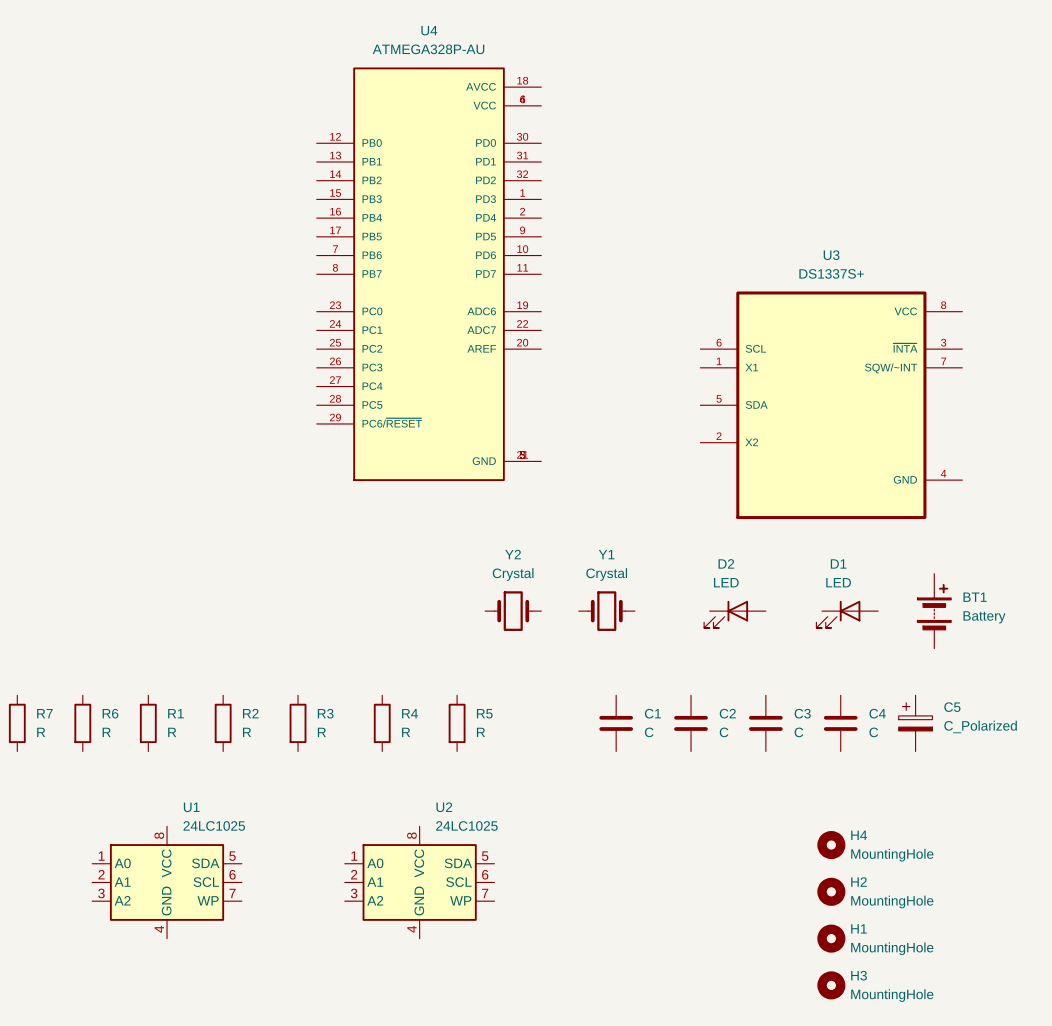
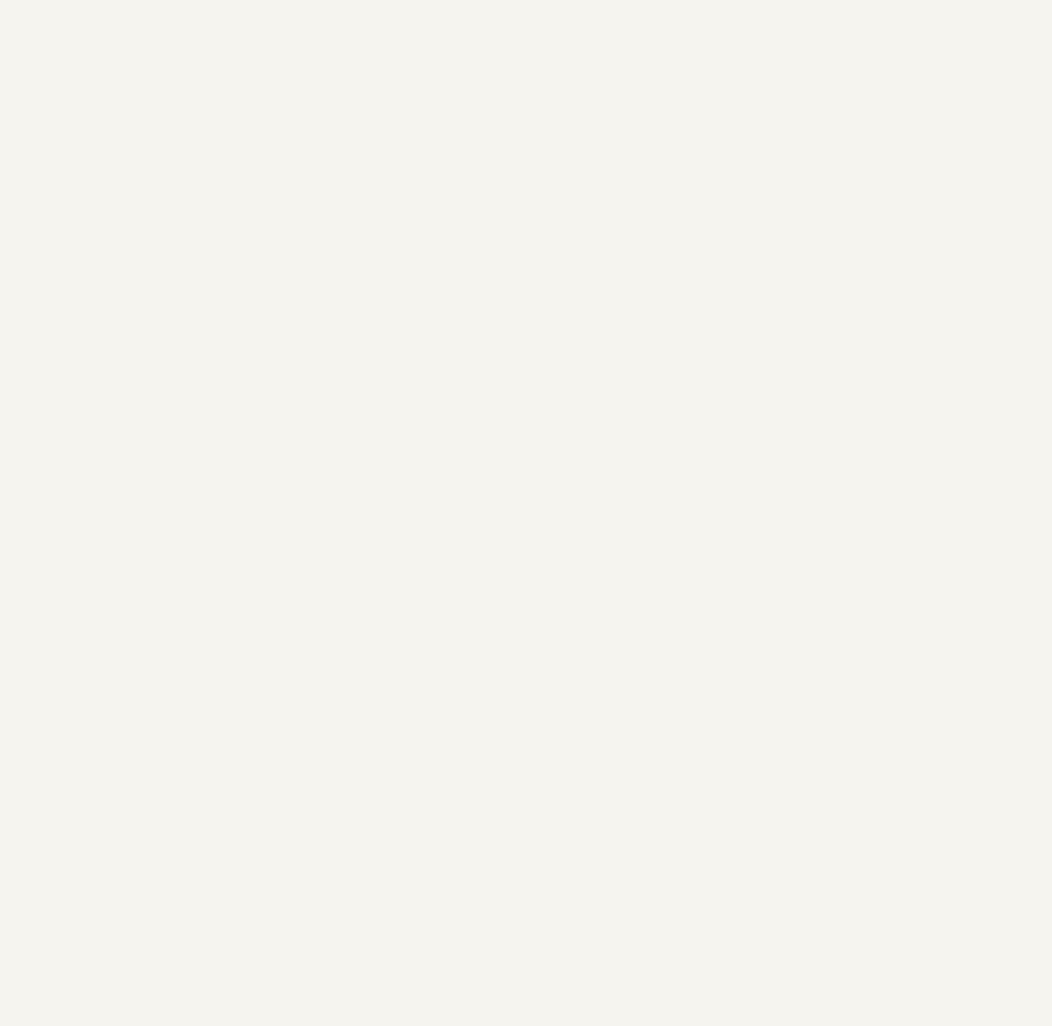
U4: ATMEGA328P-AU (429, 274) -> none
U3: DS1337S+ (831, 405) -> none
Y2: Crystal (513, 611) -> none
Y1: Crystal (606, 611) -> none
BT1: Battery (934, 611) -> none
D2: LED (734, 614) -> none
D1: LED (847, 614) -> none
R7: R (17, 723) -> none
R6: R (82, 723) -> none
R1: R (148, 723) -> none
R2: R (223, 723) -> none
R3: R (298, 723) -> none
R4: R (382, 723) -> none
R5: R (457, 723) -> none
C1: C (616, 723) -> none
C2: C (691, 723) -> none
C3: C (765, 723) -> none
C4: C (840, 723) -> none
C5: C_Polarized (915, 723) -> none
H4: MountingHole (831, 845) -> none
U1: 24LC1025 (167, 882) -> none
U2: 24LC1025 (419, 882) -> none
H2: MountingHole (831, 891) -> none
H1: MountingHole (831, 938) -> none
H3: MountingHole (831, 985) -> none

